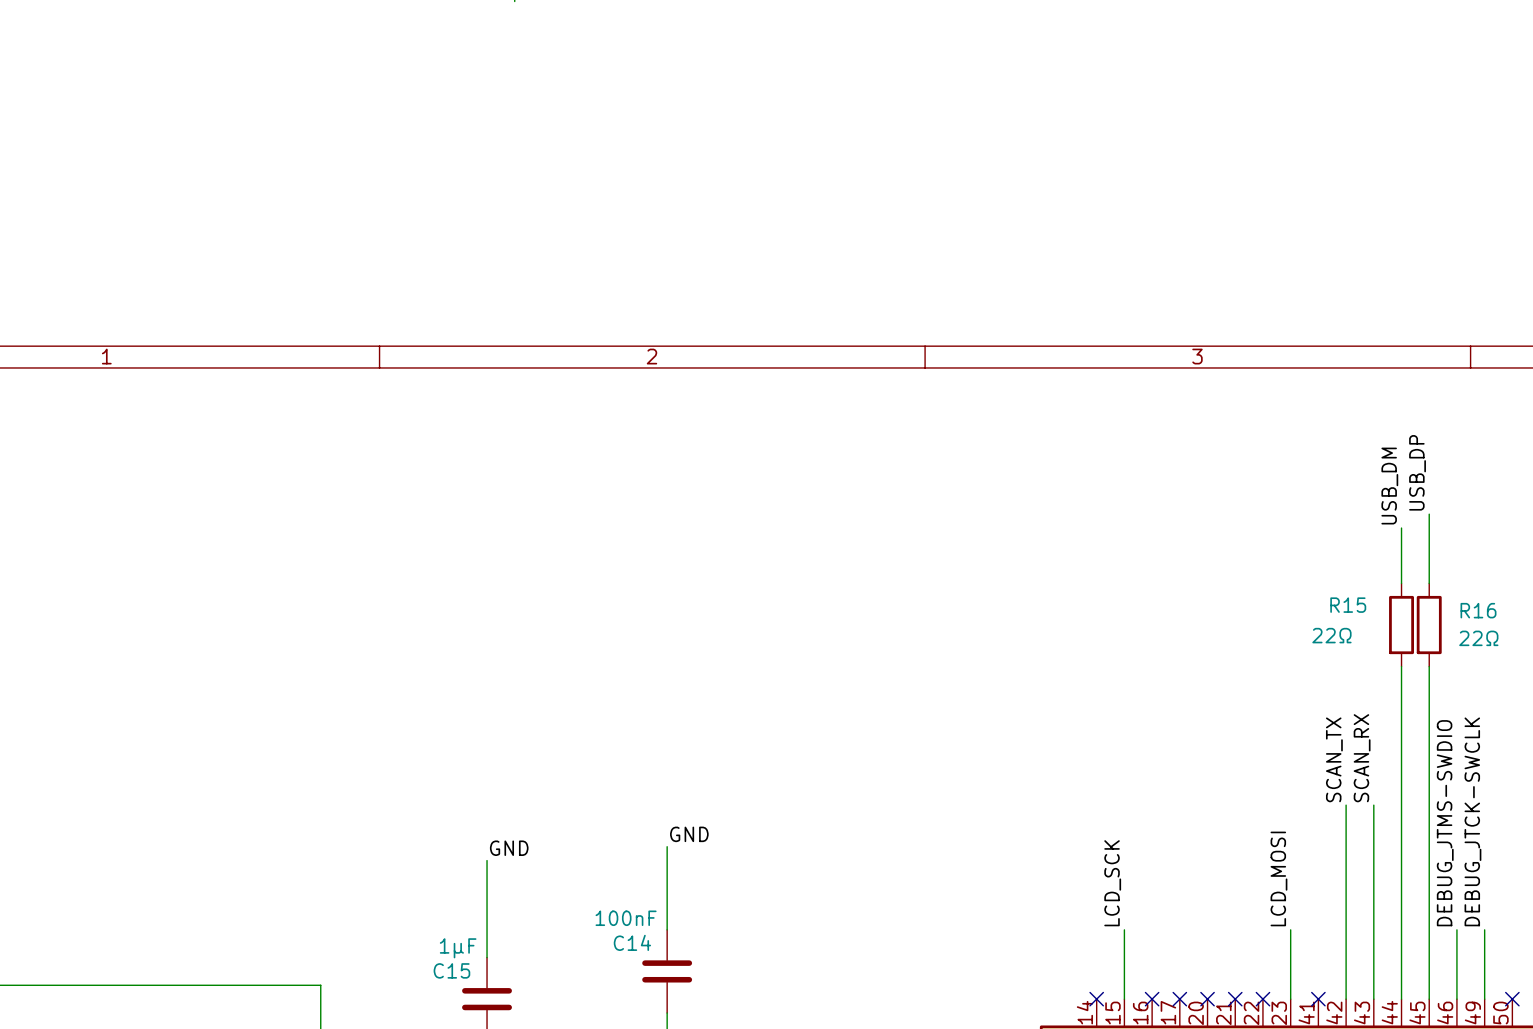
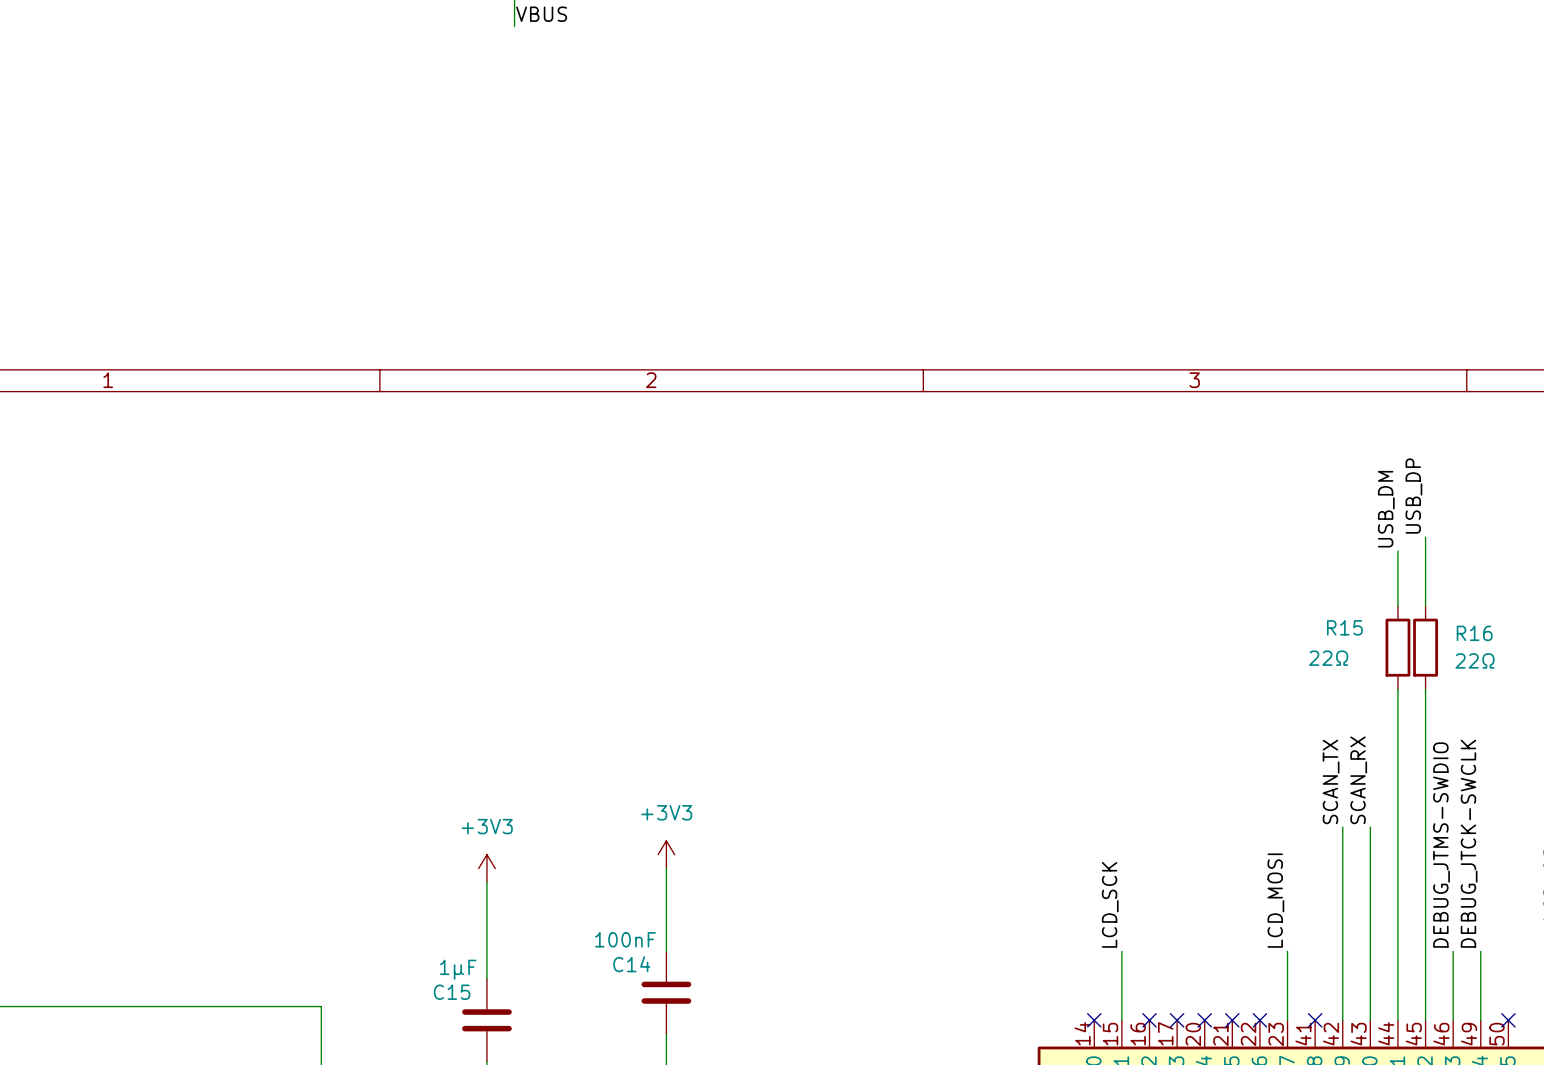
power symbol: none -> +3V3 (666, 854)
label: GND (689, 834) -> none
power symbol: none -> +3V3 (486, 868)
label: GND (509, 848) -> none

